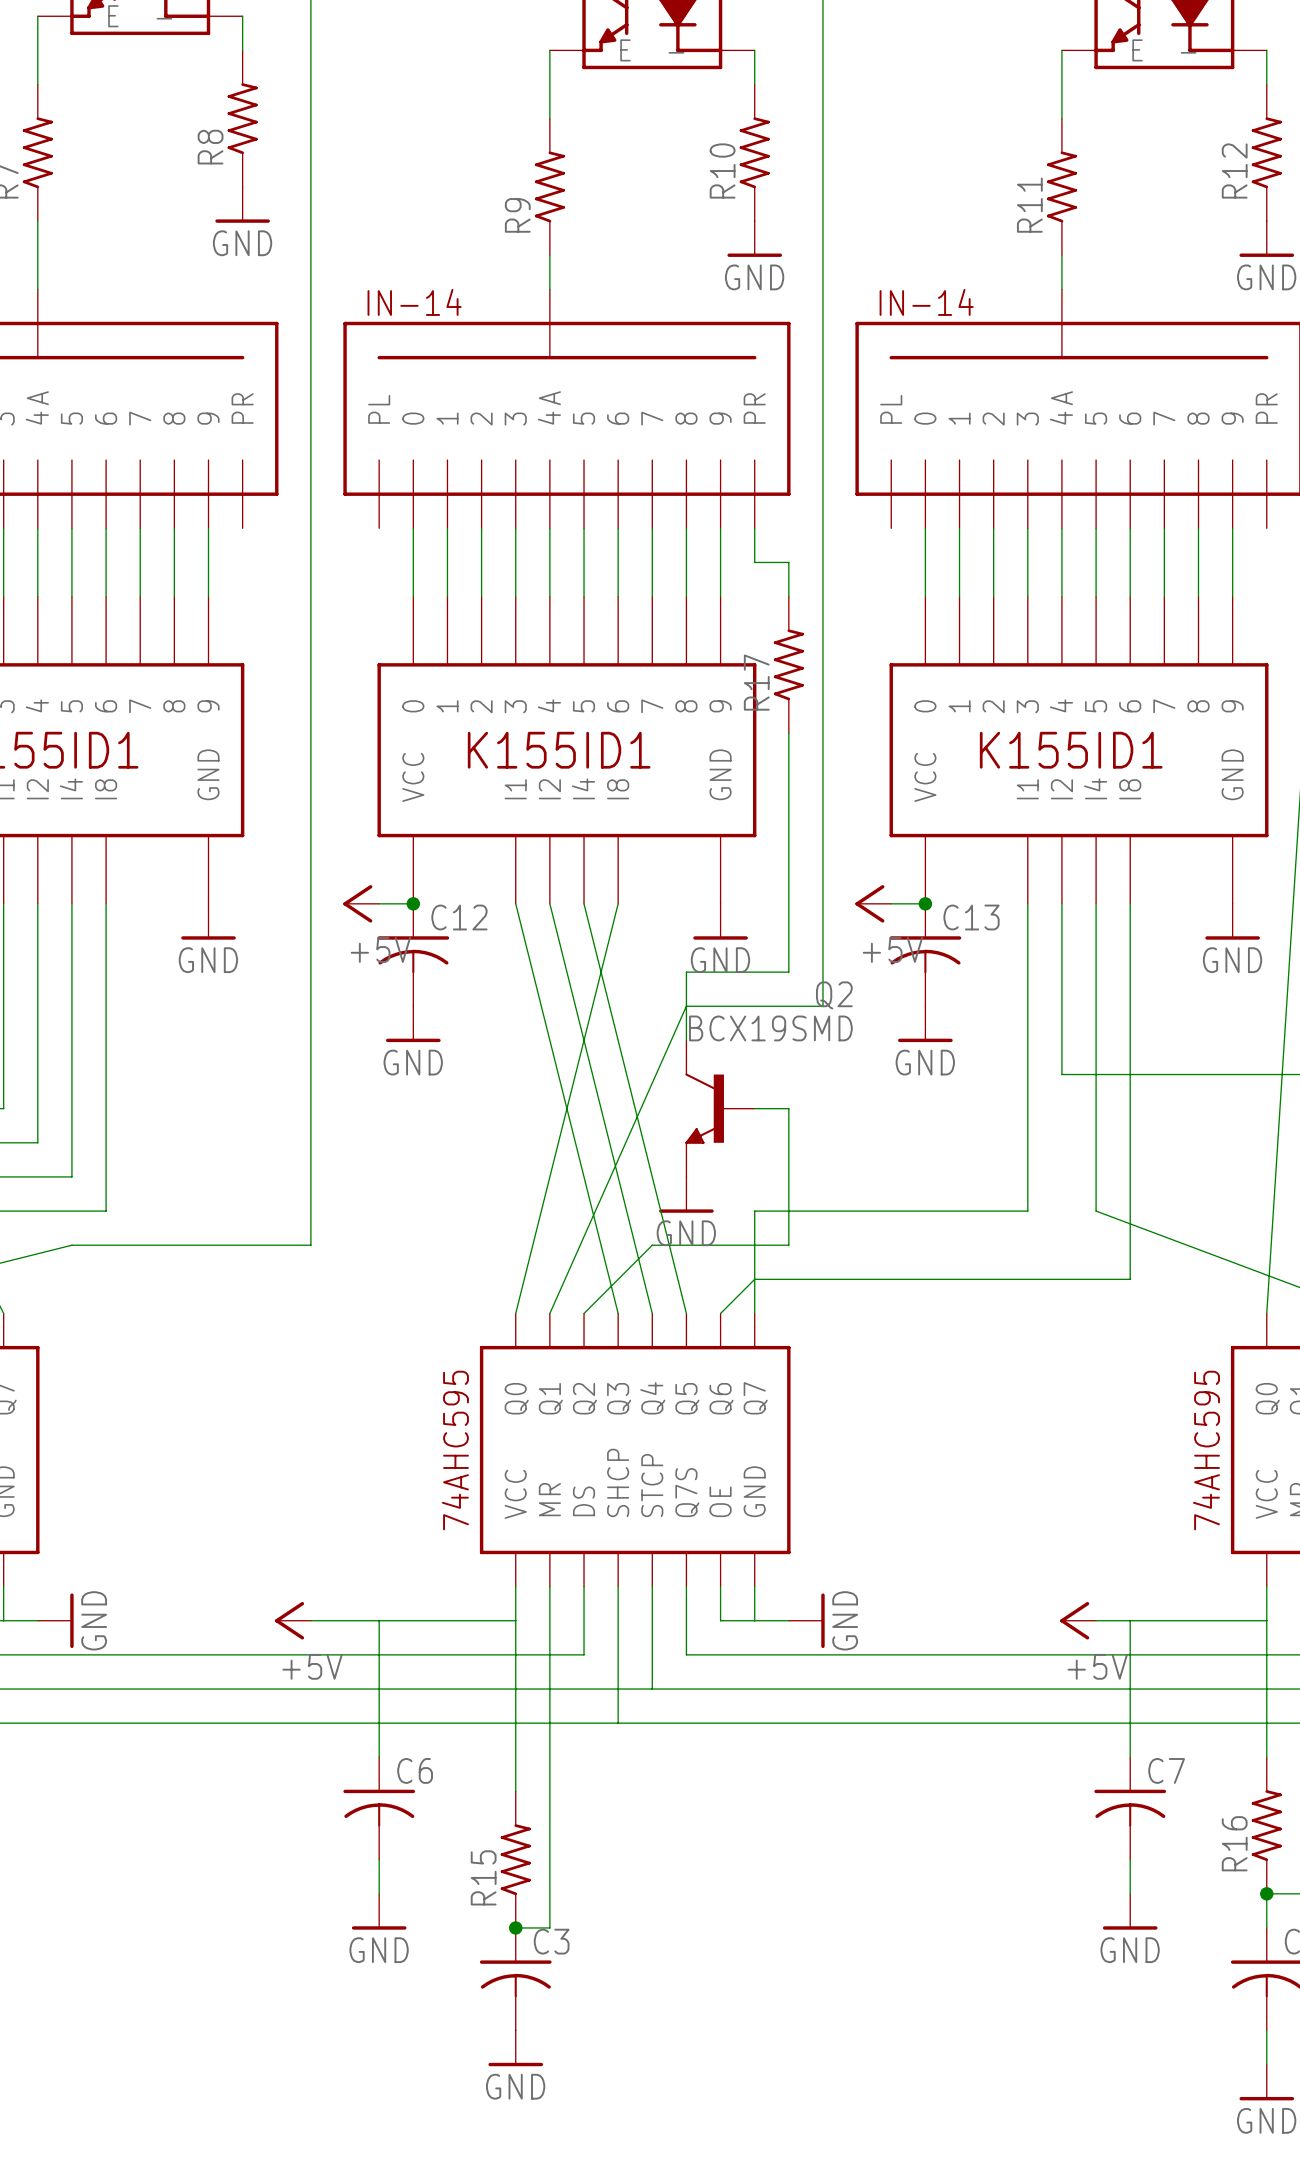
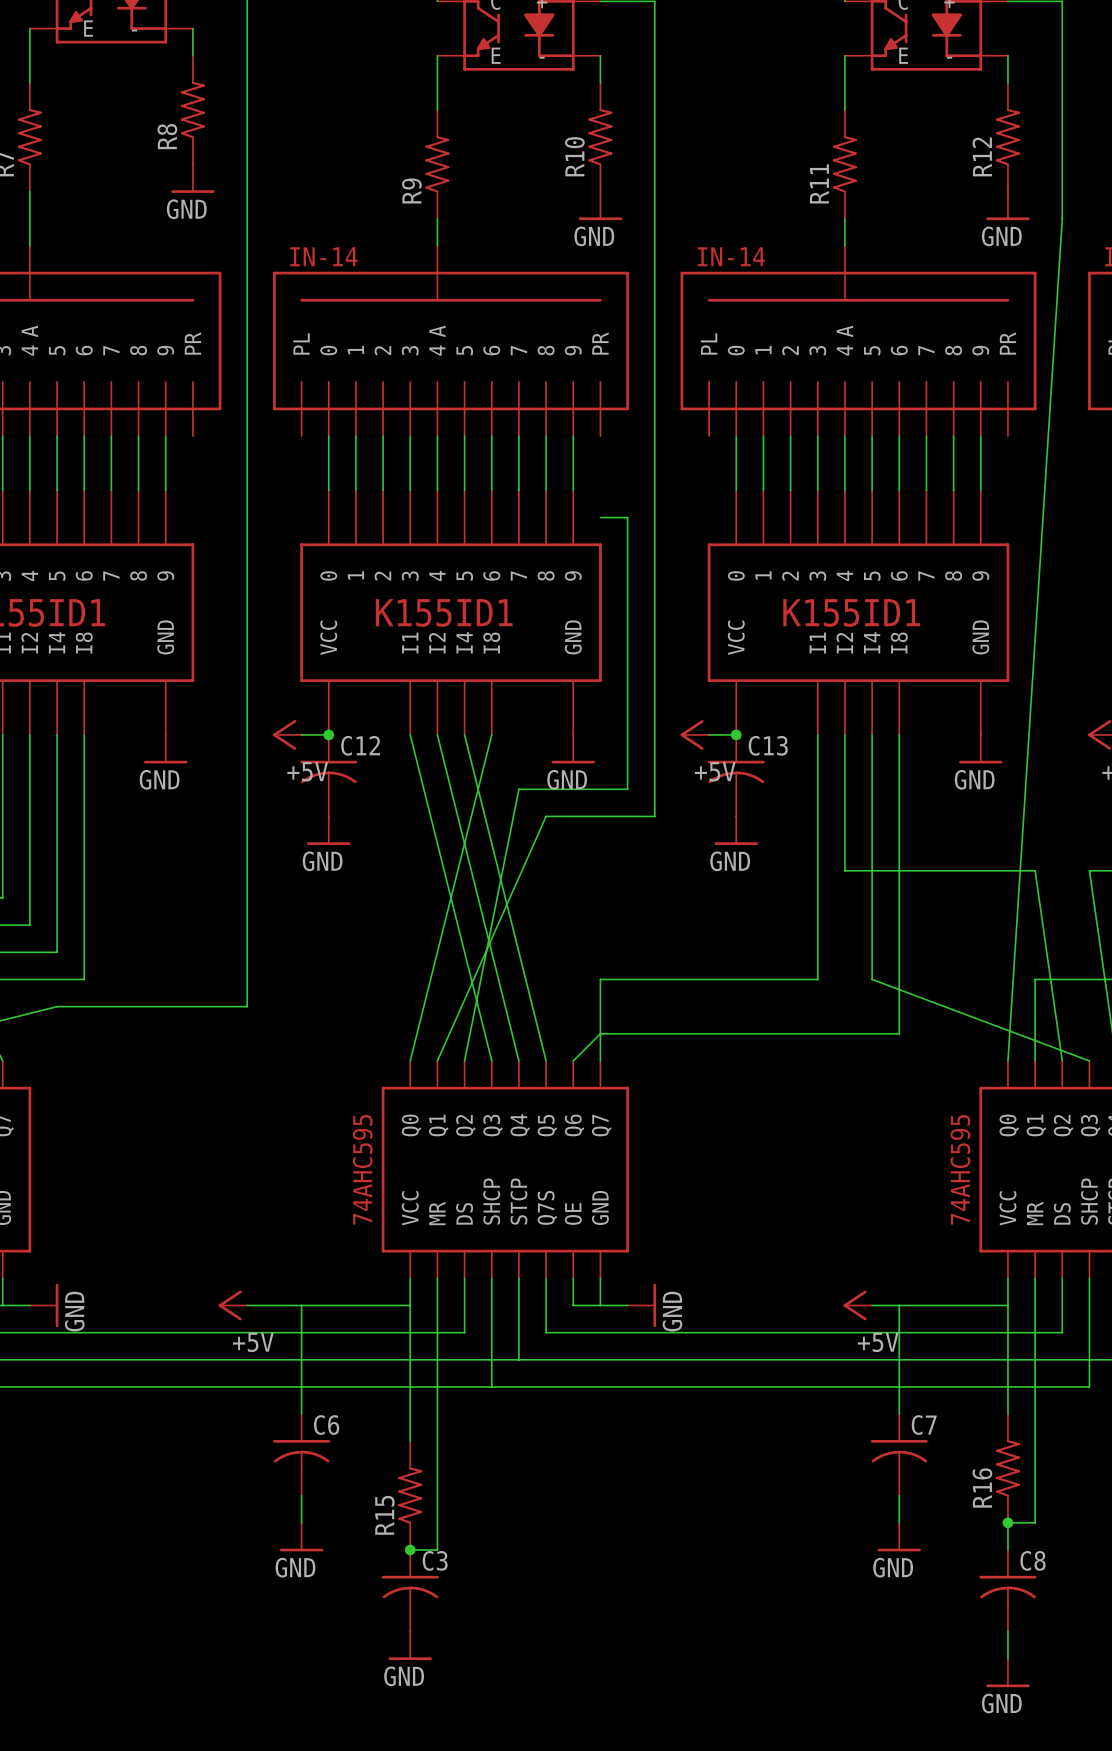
wire: (754, 528) (754, 562) (788, 562) (788, 596) -> none
wire: none -> (600, 517) (627, 517) (627, 599)
R17: (788, 664) -> none
wire: (686, 972) (686, 1040) -> none
Q2: BCX19SMD (720, 1108) -> none
wire: (754, 1108) (788, 1108) (788, 1245) (652, 1245) (584, 1313) -> (546, 789) (518, 789) (464, 1060)
power symbol: GND (686, 1194) -> none

